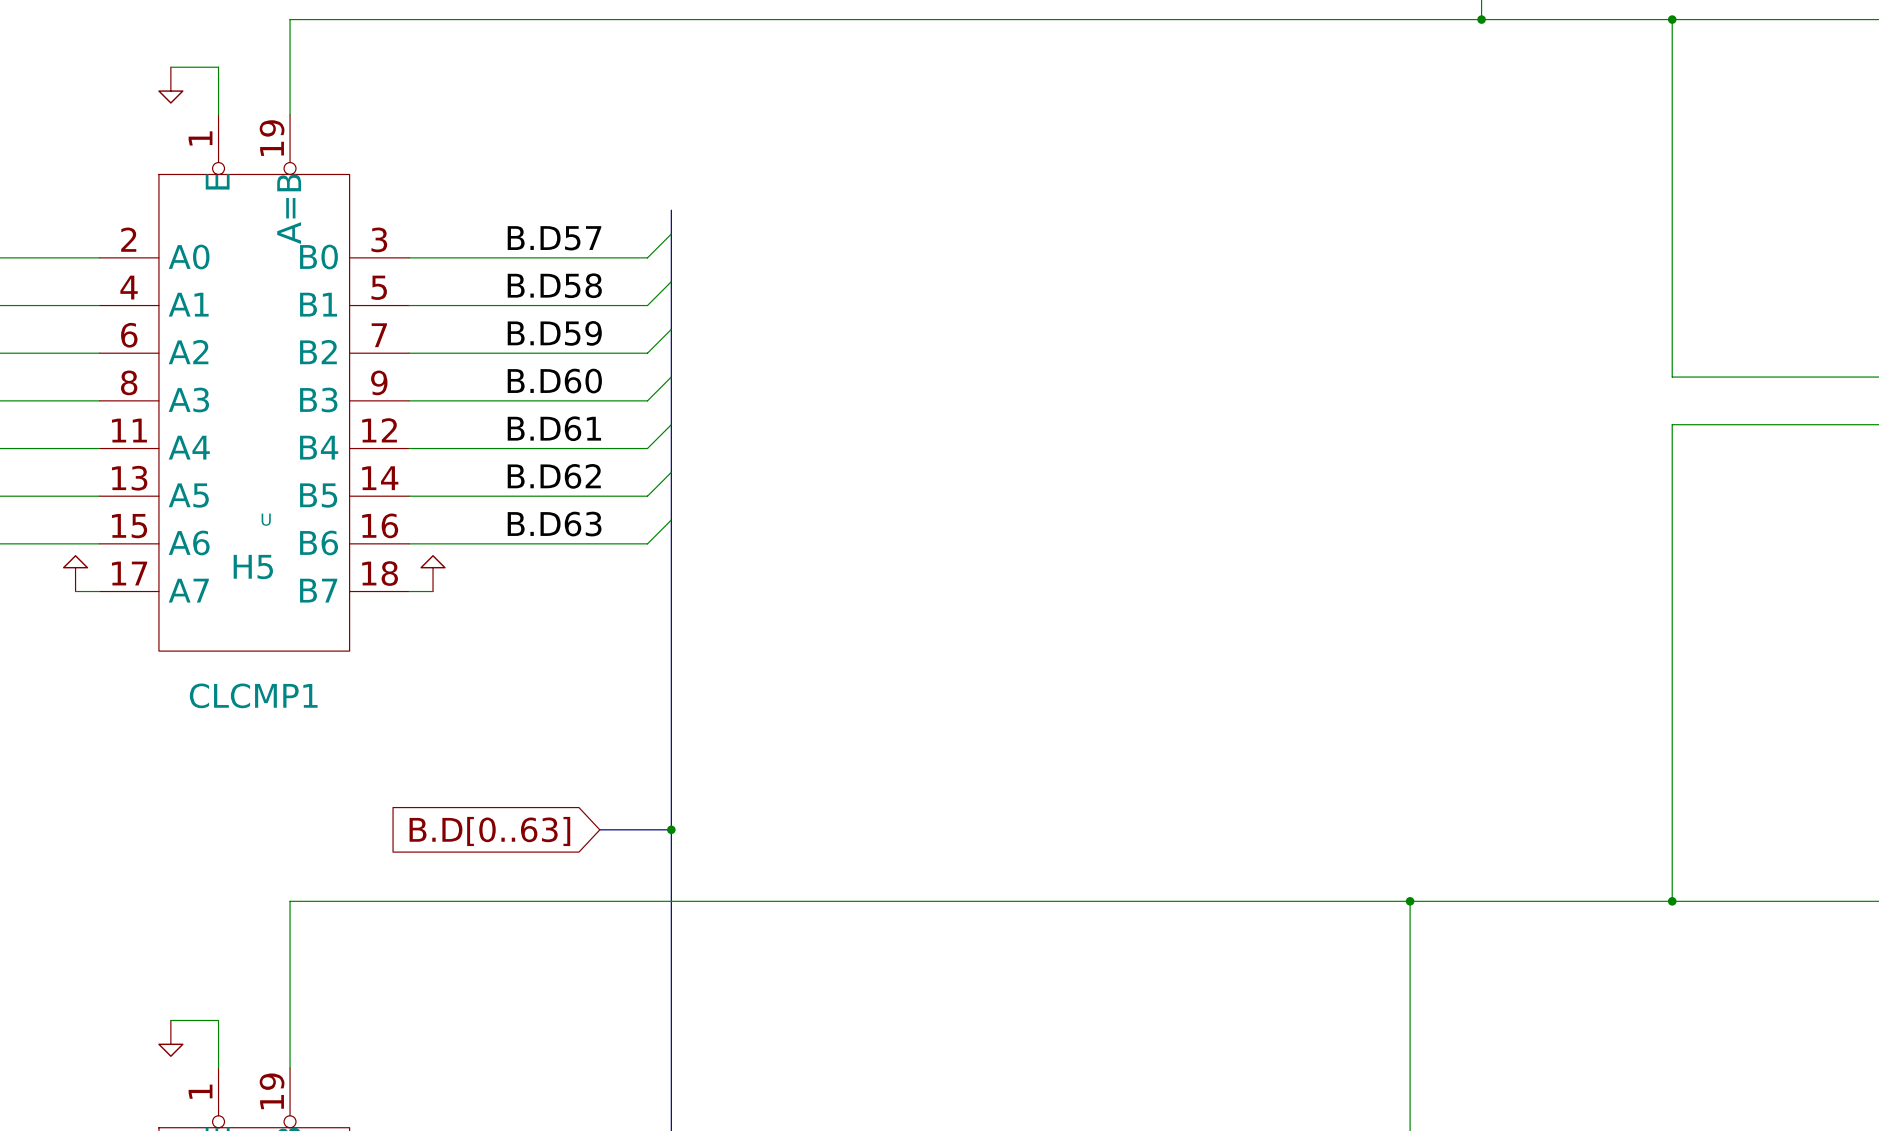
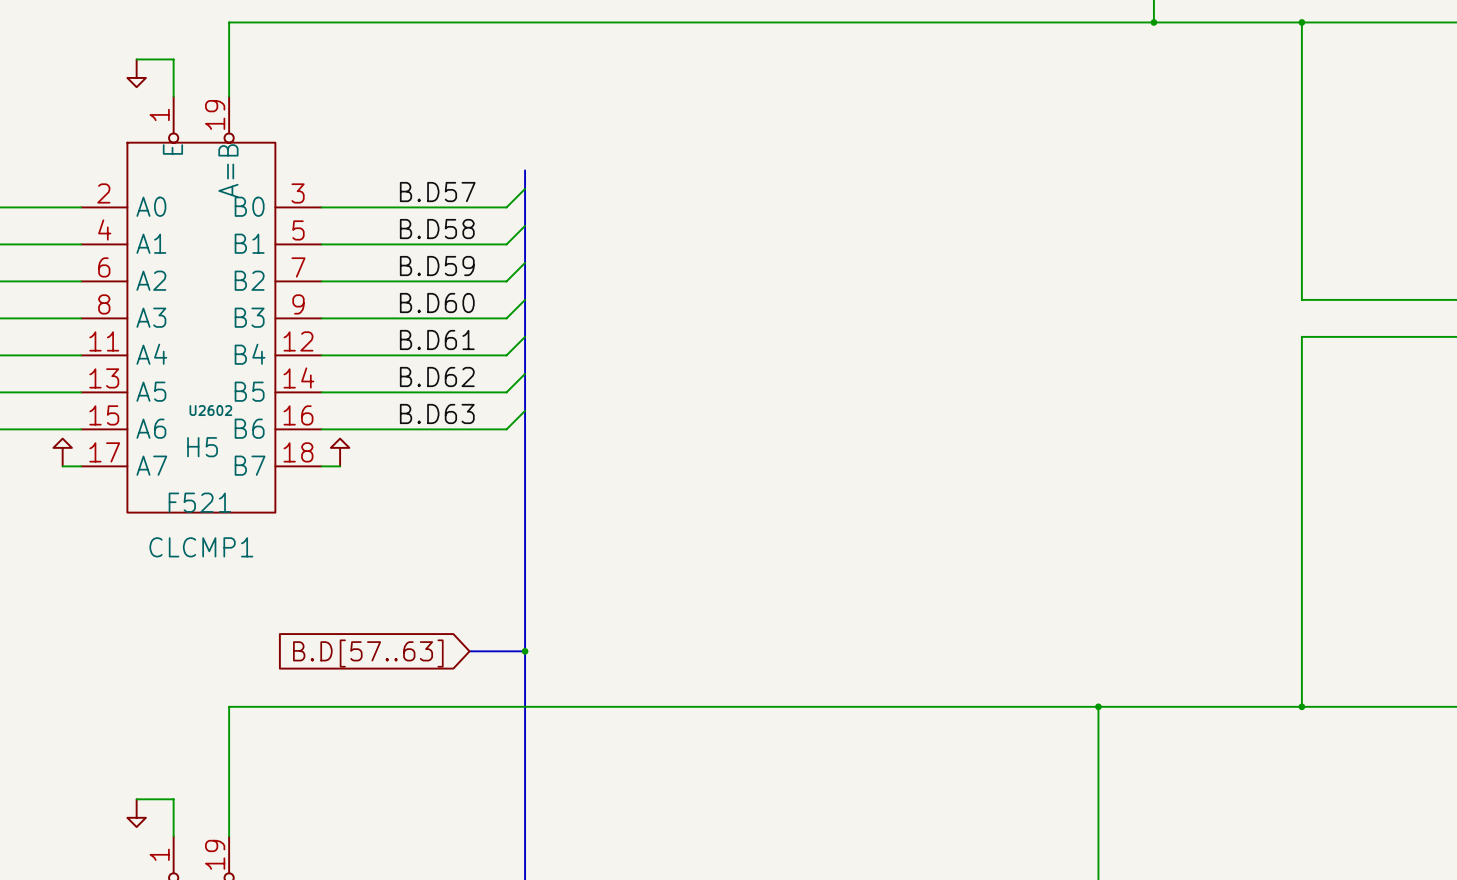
U name: U (266, 519) -> U2602 (210, 410)
U value: none -> F521 (199, 502)
global label: B.D[0..63] (489, 831) -> B.D[57..63] (368, 653)

